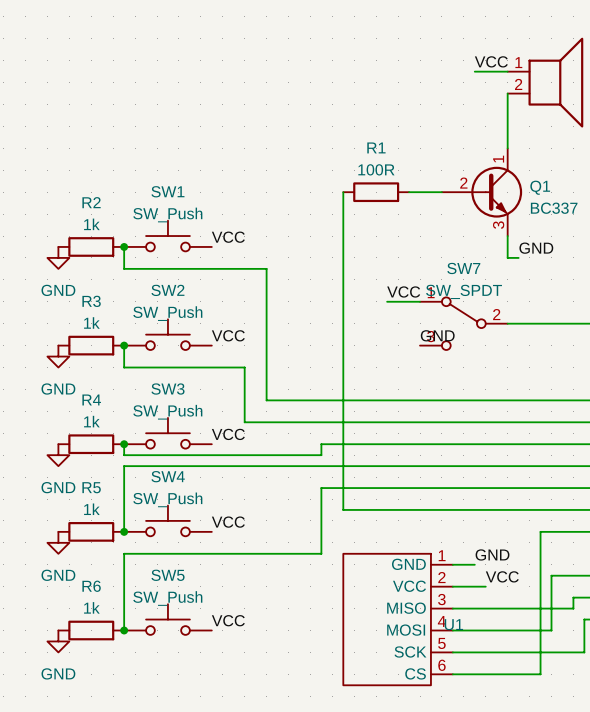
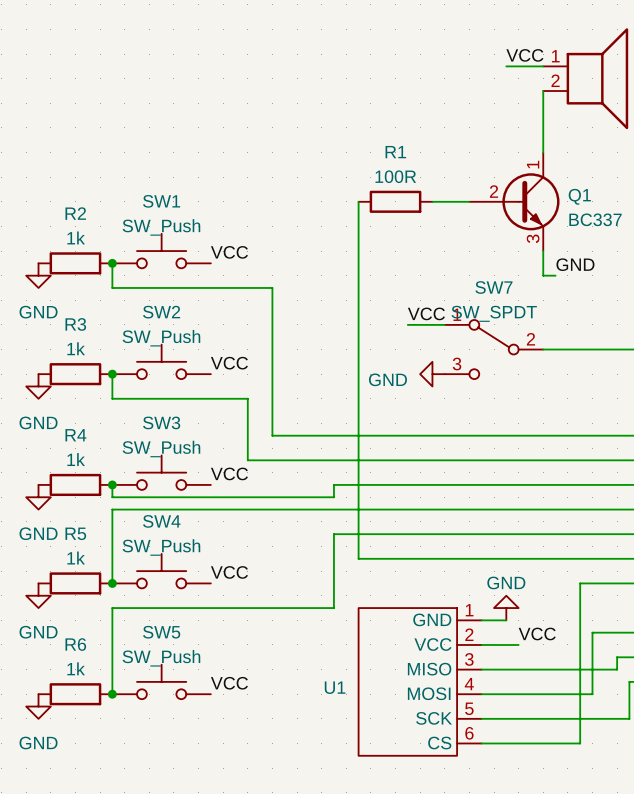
label: GND (437, 335) -> none
power symbol: none -> GND (432, 374)
power symbol: none -> GND (506, 608)
label: GND (492, 554) -> none
U1 name position: U1 (453, 624) -> U1 (335, 687)

